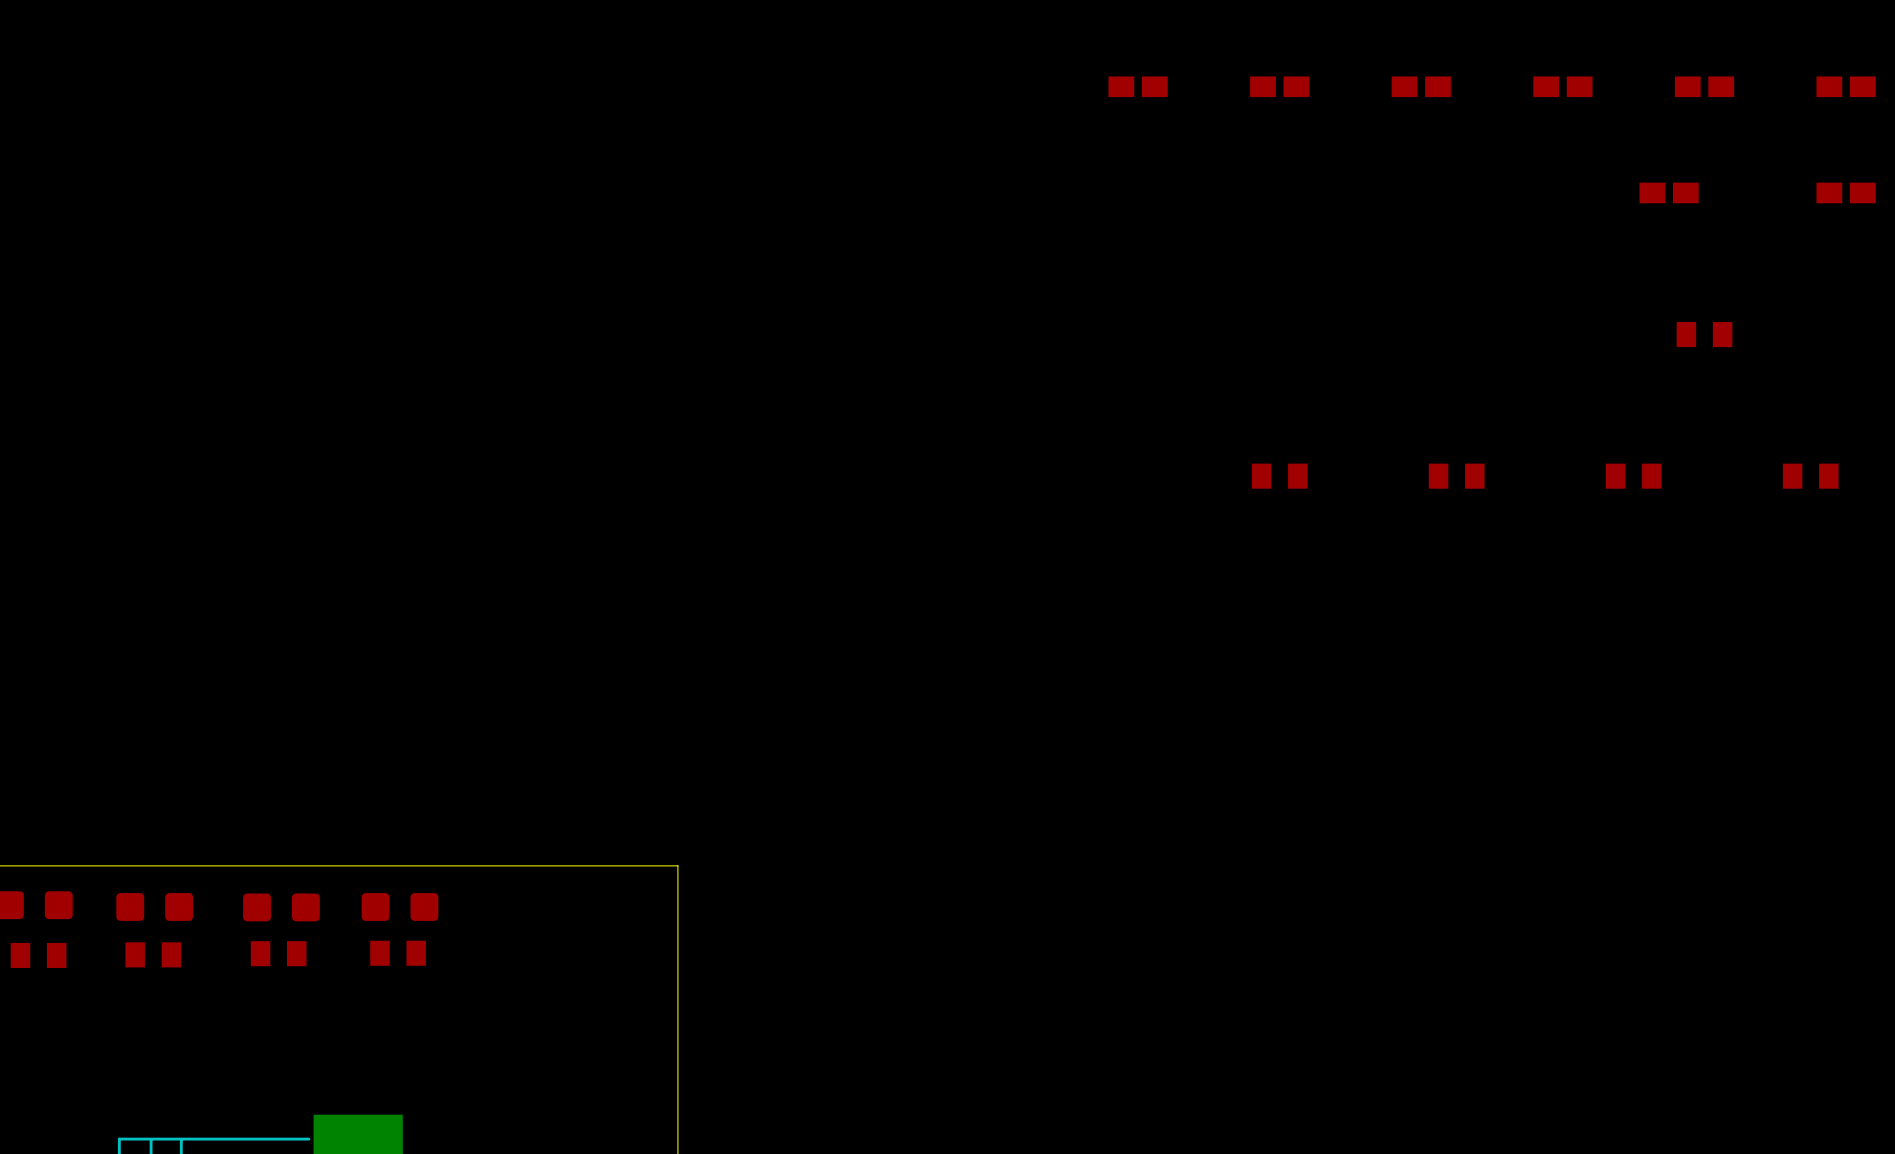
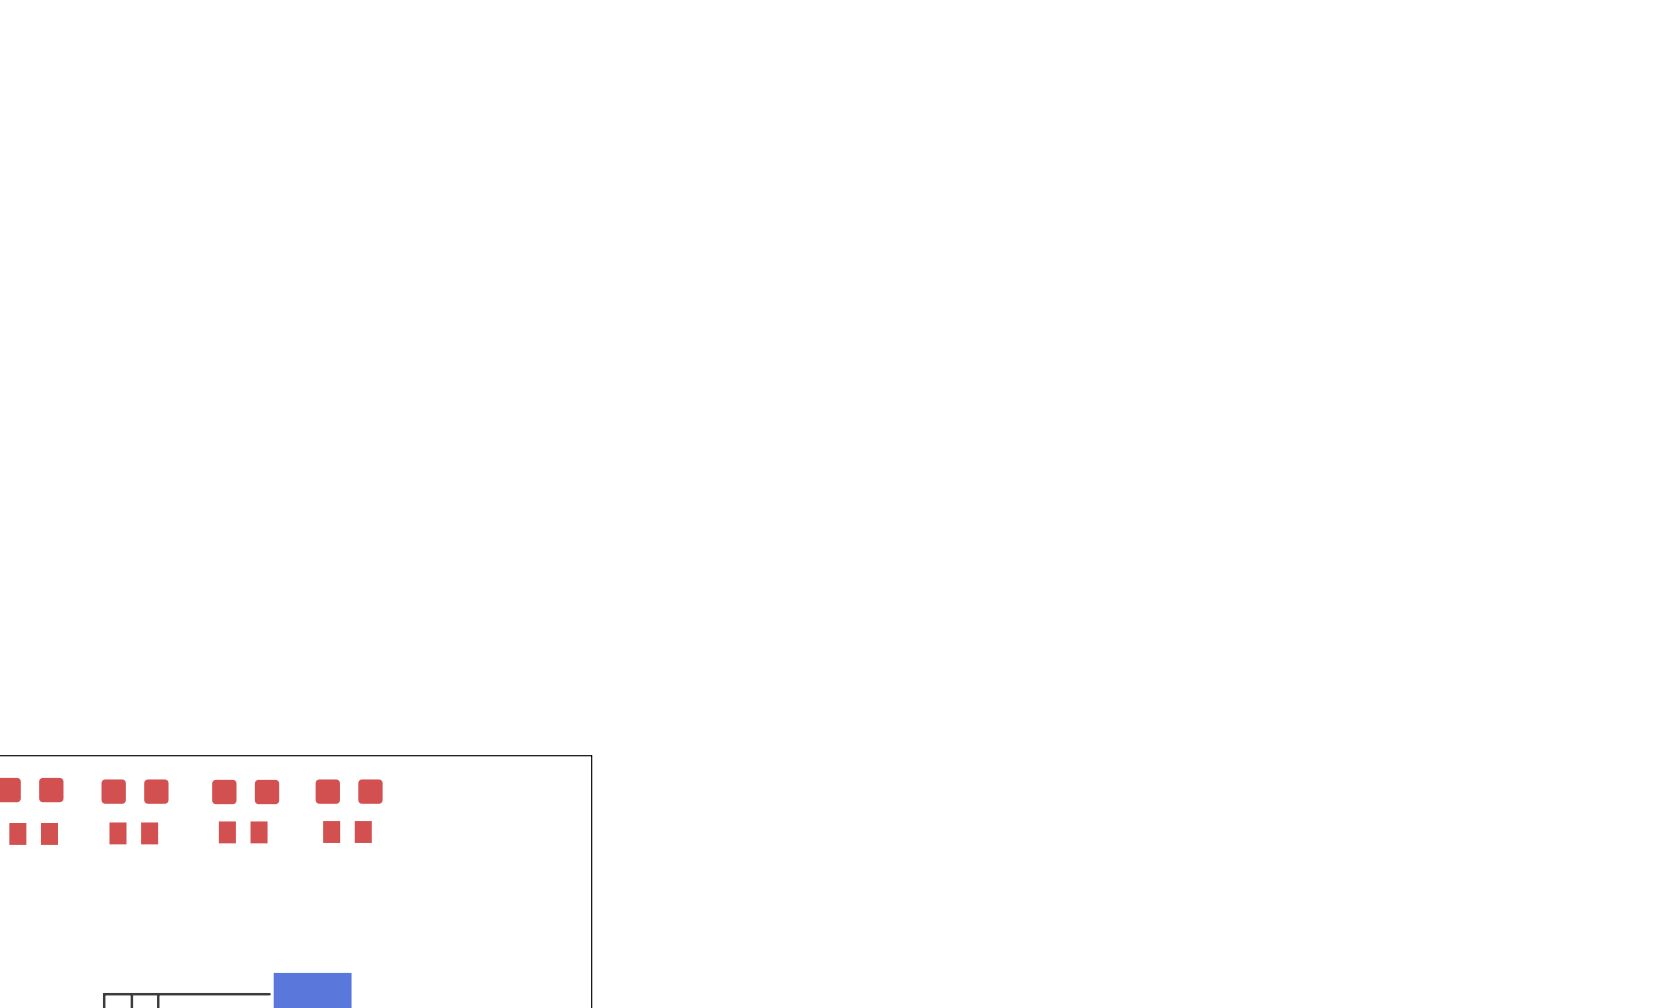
part: (1138, 86) -> none
part: (1279, 86) -> none
part: (1421, 86) -> none
part: (1562, 86) -> none
part: (1704, 86) -> none
part: (1846, 86) -> none
part: (1669, 192) -> none
part: (1846, 192) -> none
part: (1704, 334) -> none
part: (1279, 476) -> none
part: (1456, 476) -> none
part: (1633, 476) -> none
part: (1810, 476) -> none

